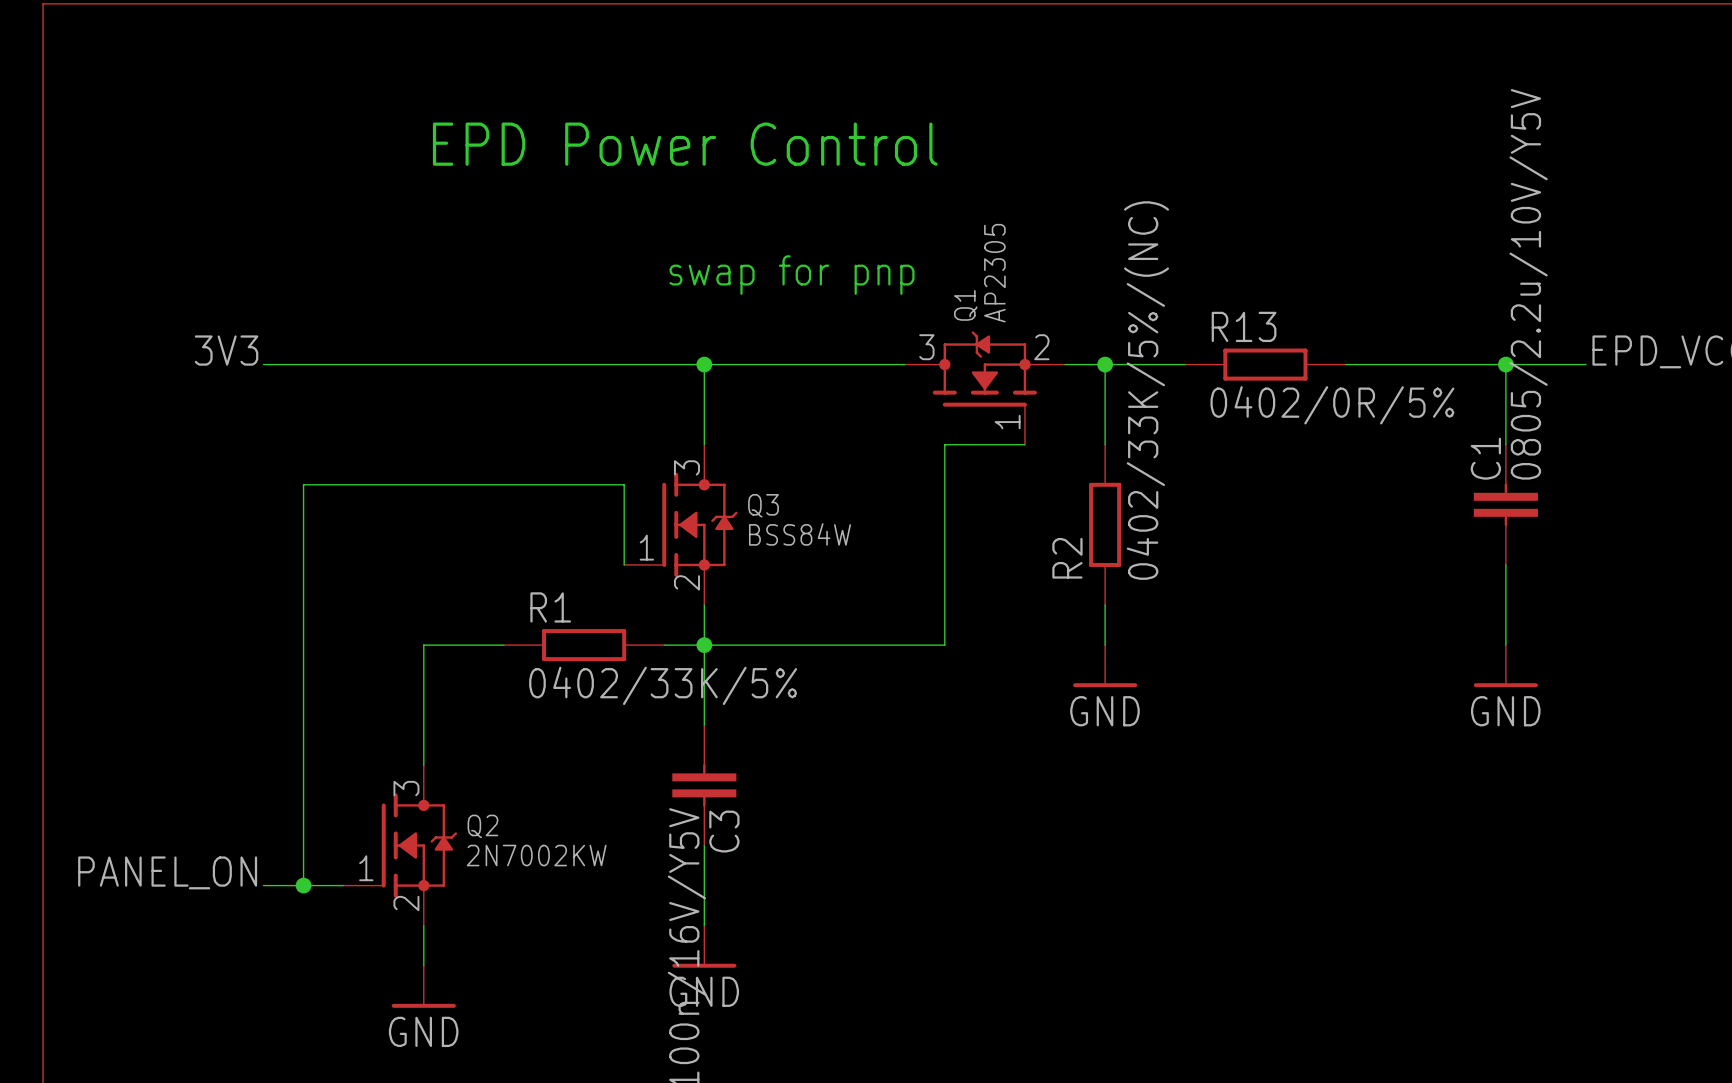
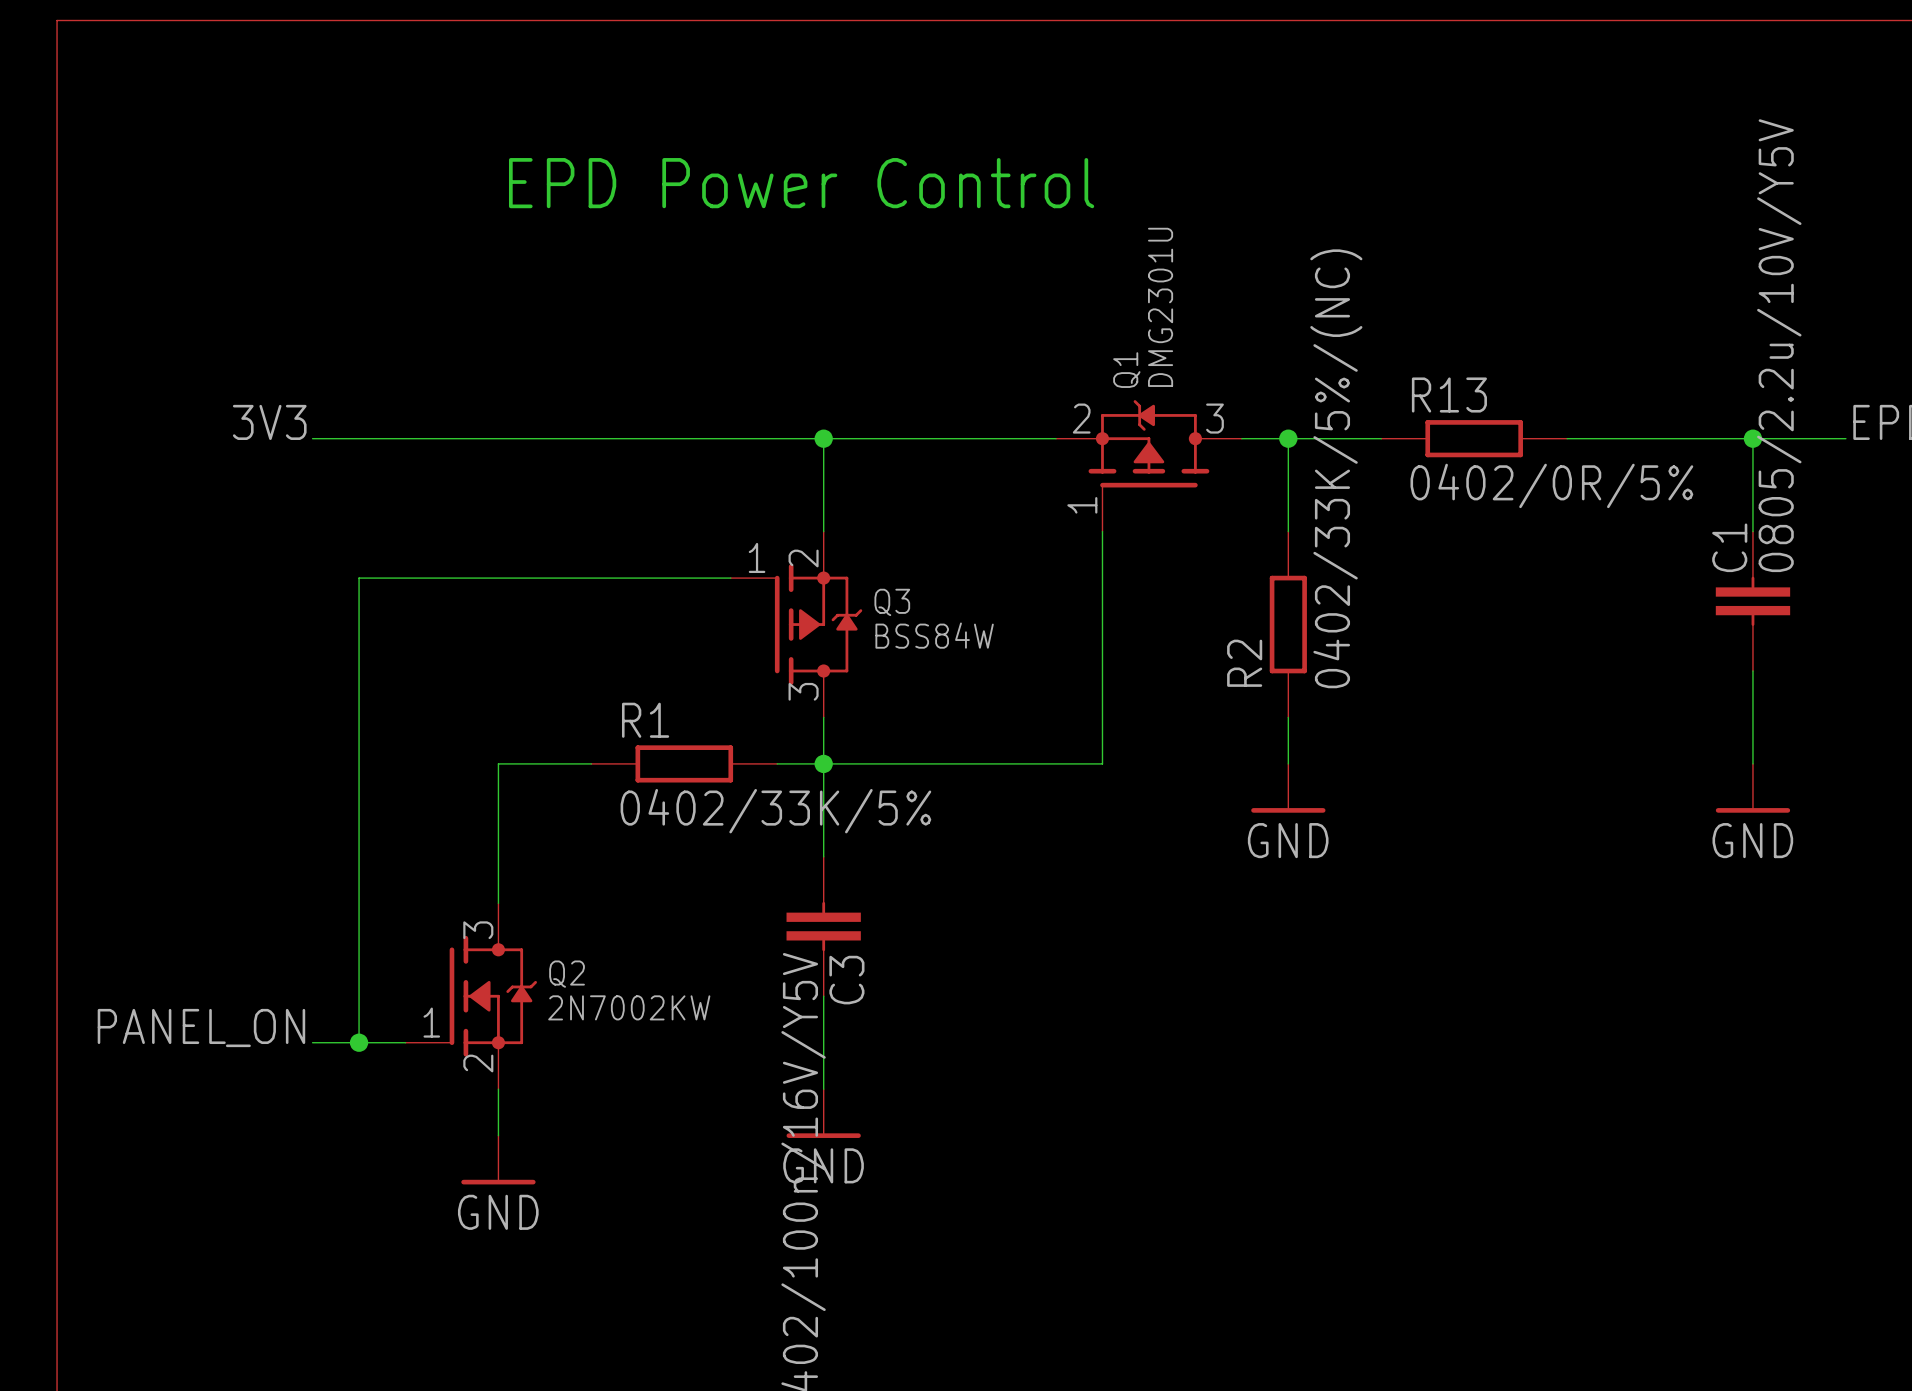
Q1 value: AP2305 (994, 273) -> DMG2301U (1160, 307)
text: swap for pnp (791, 275) -> none
Q1 symbol: [904, 331, 1066, 445] -> [1056, 400, 1242, 532]
Q3 symbol: [624, 444, 738, 606] -> [730, 531, 863, 718]
wire: (944, 444) (1024, 444) -> none
wire: (624, 484) (624, 564) -> none

